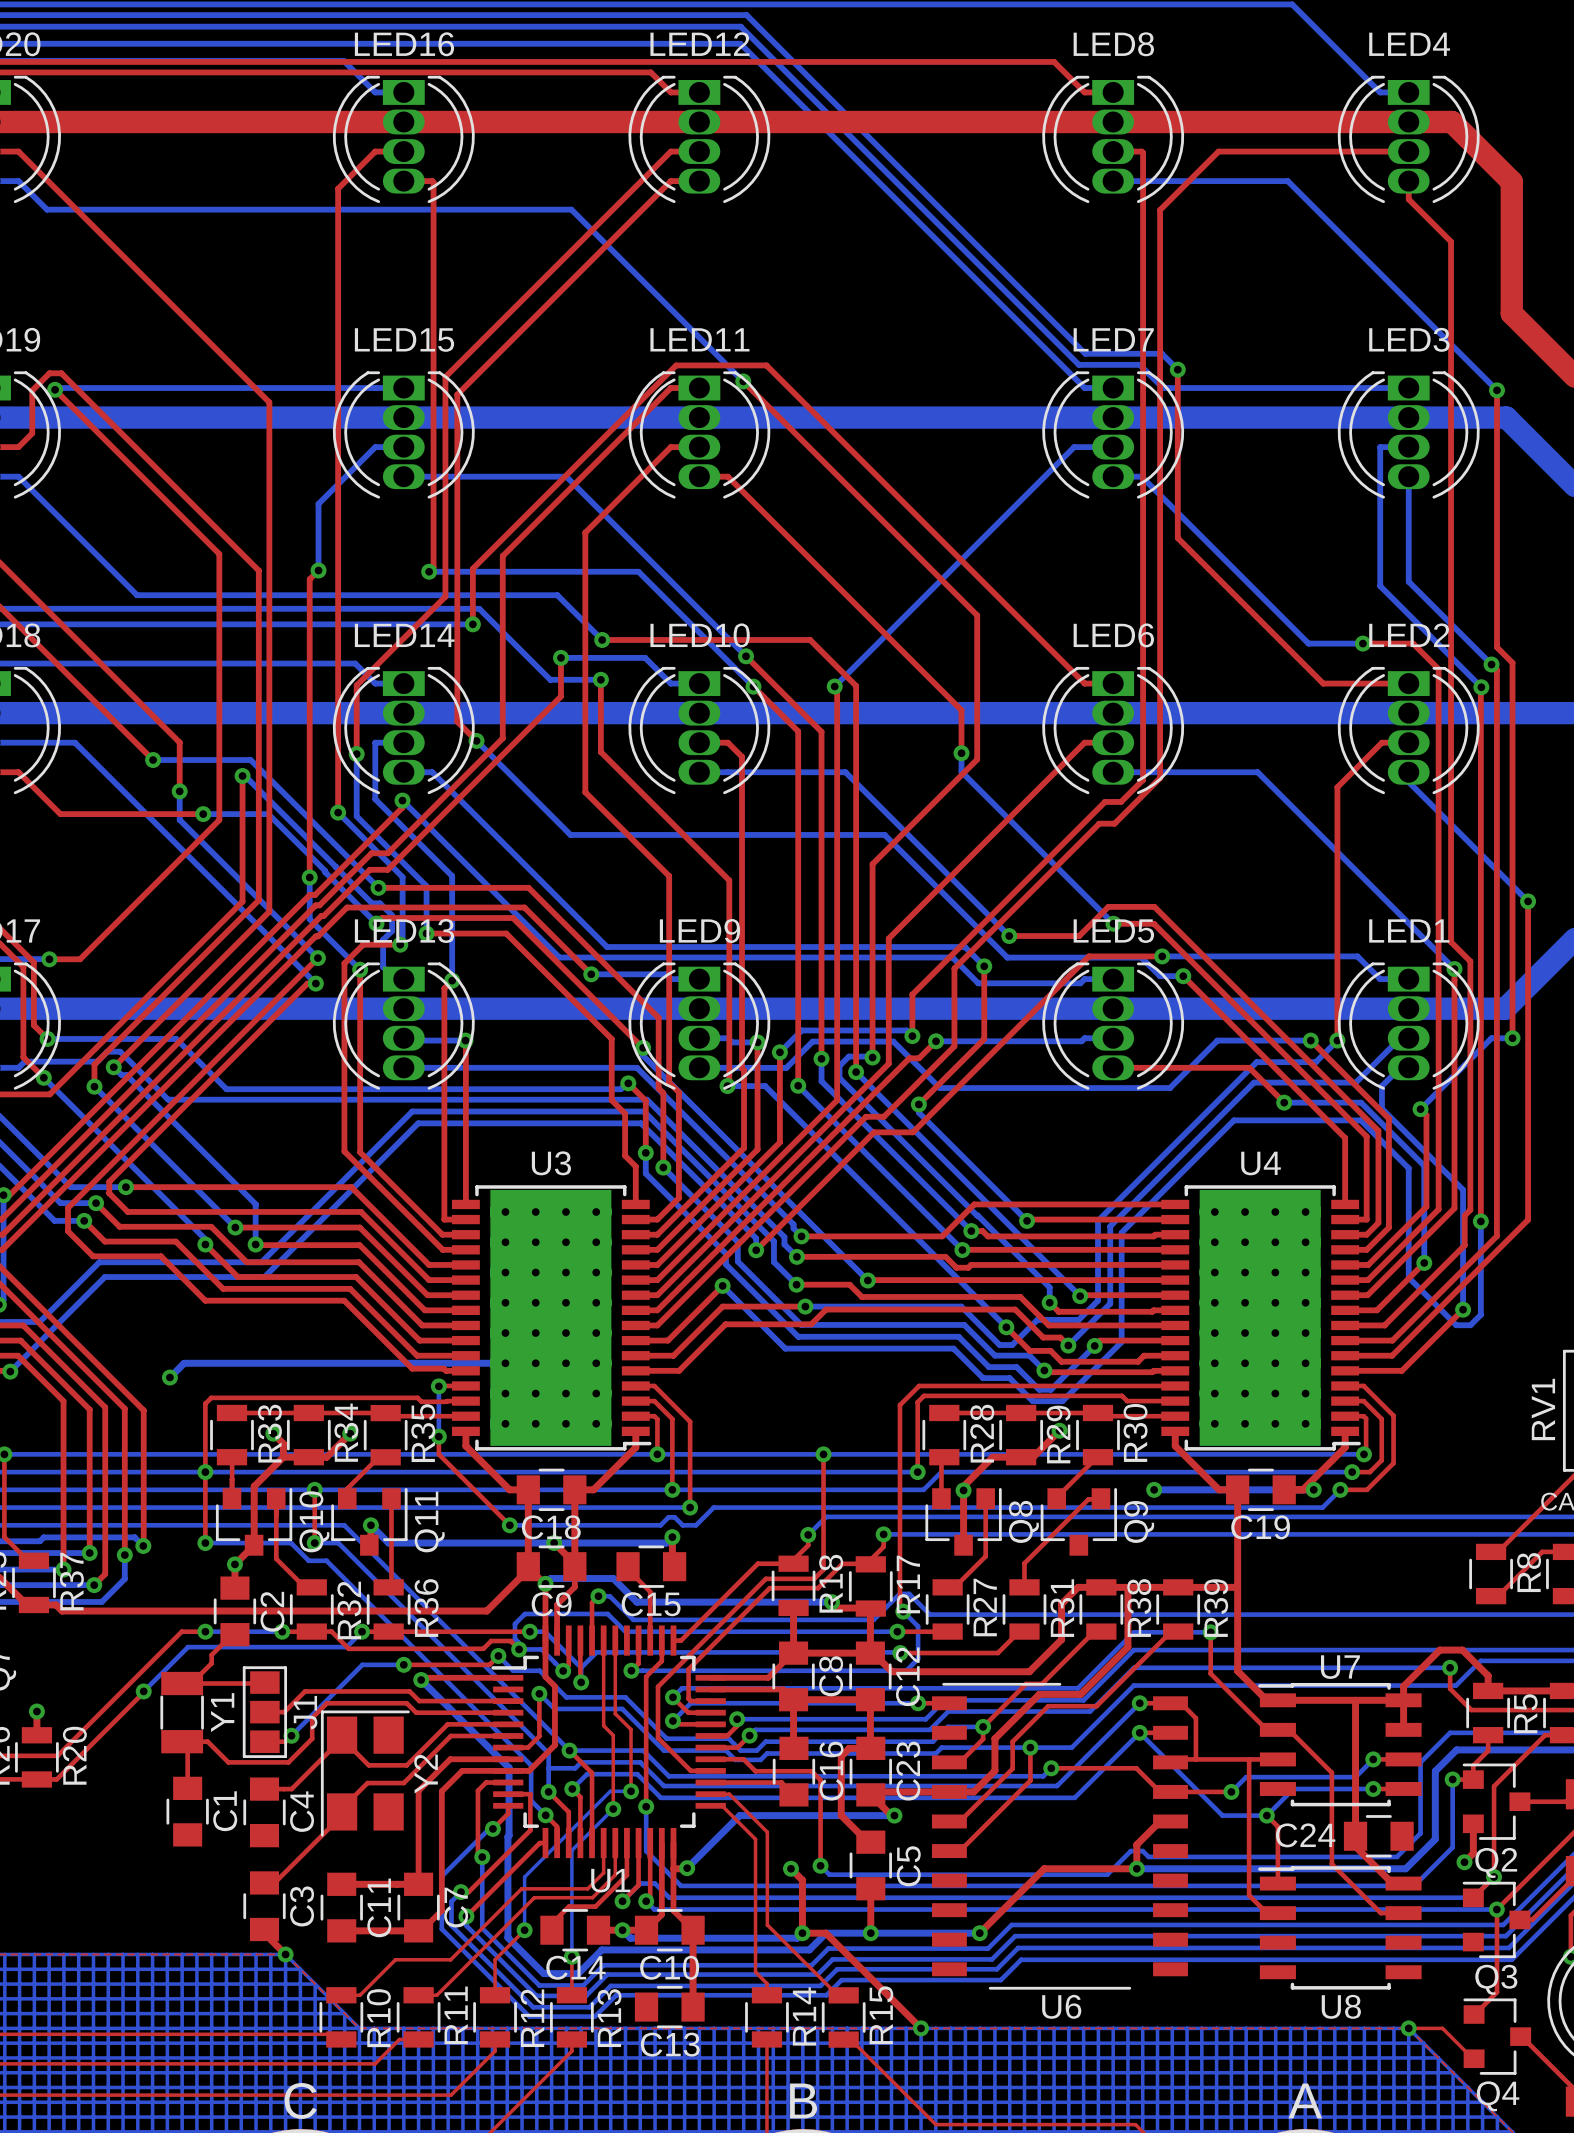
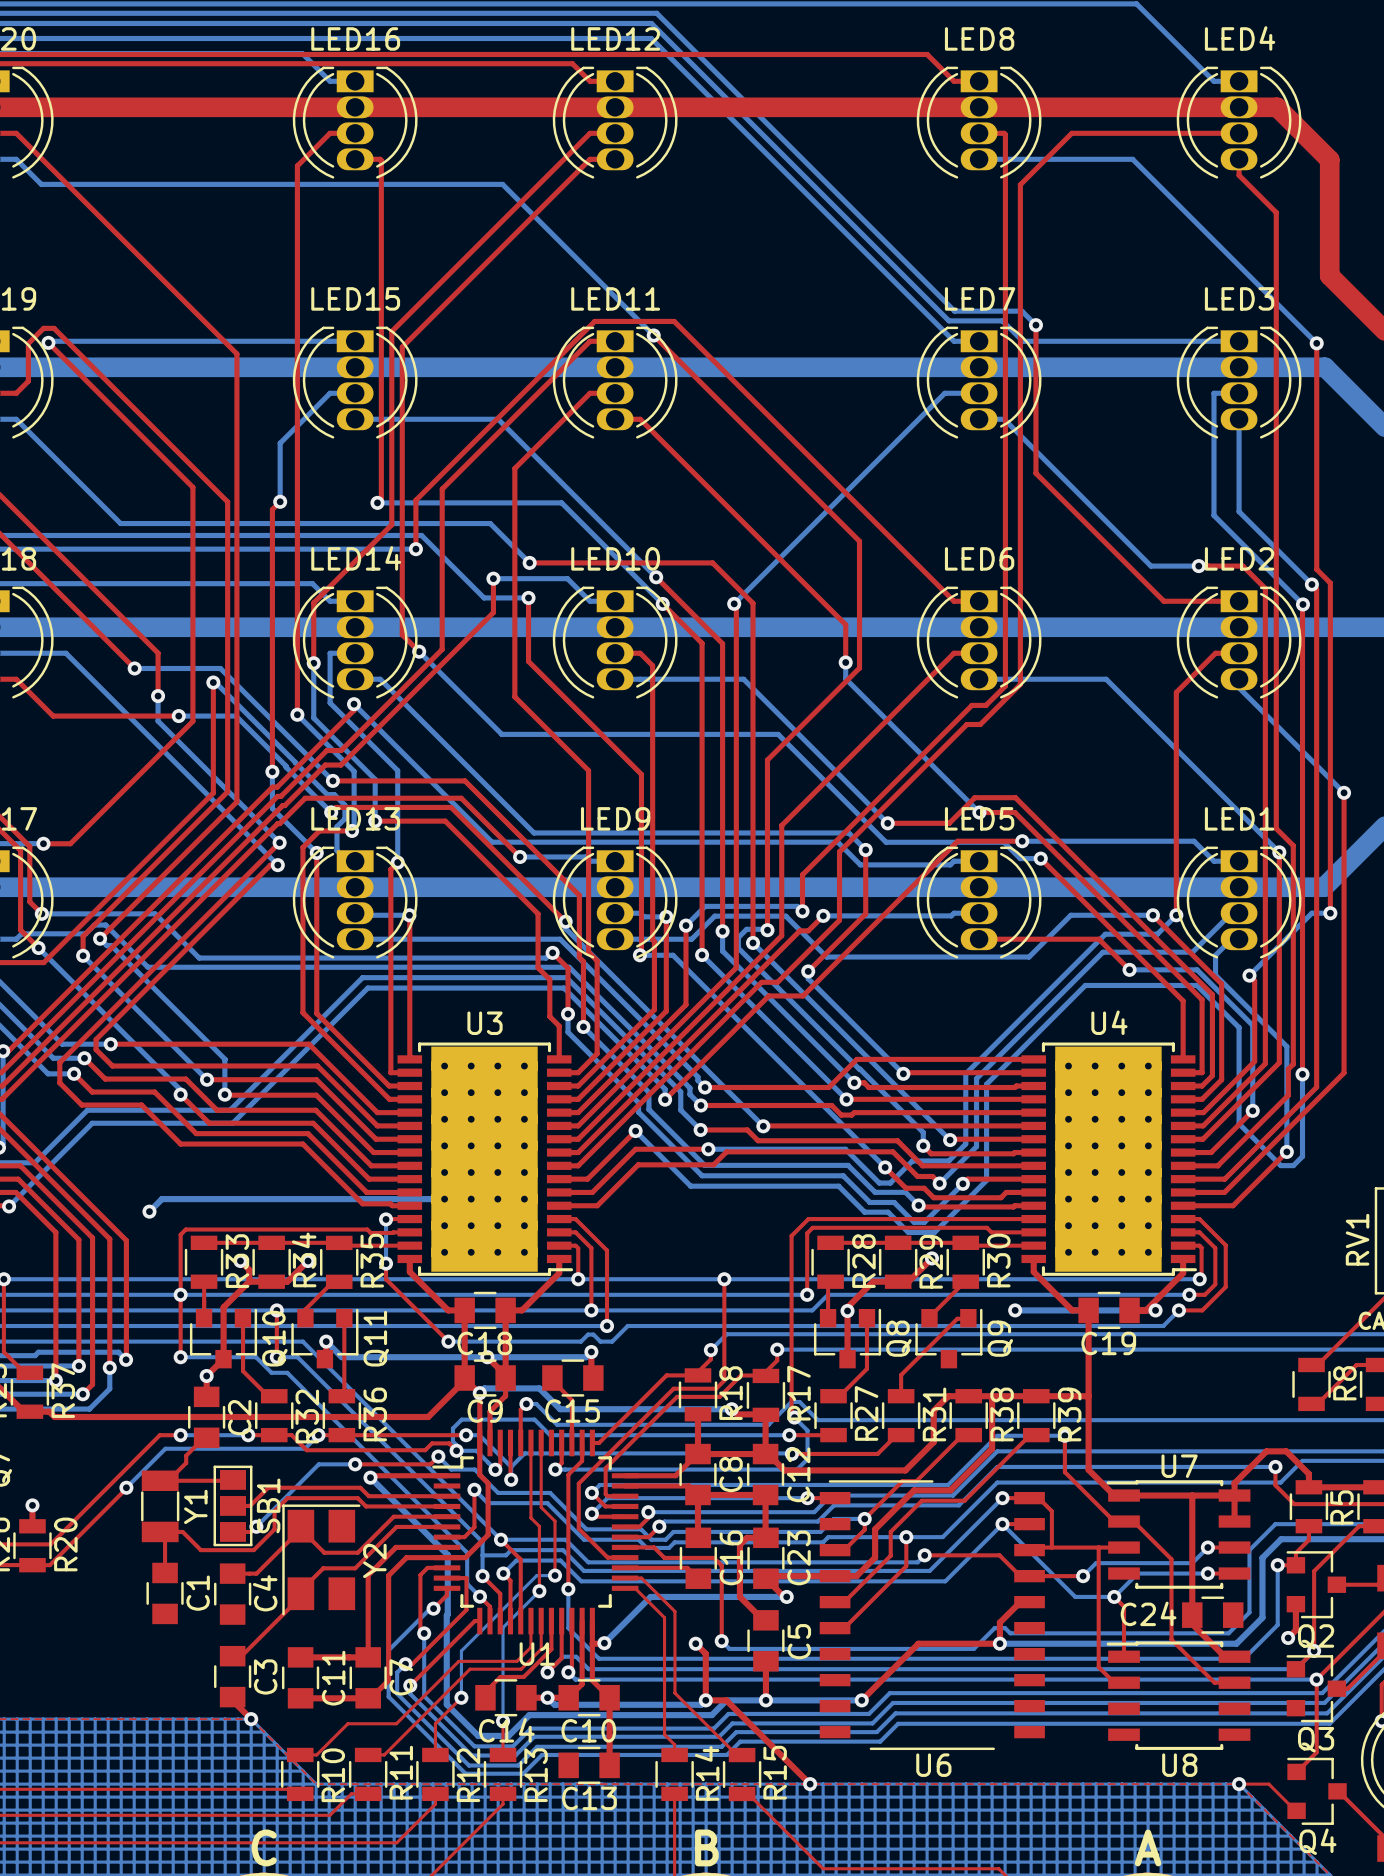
J1 name: J1 (305, 1712) -> SB1 (268, 1505)

